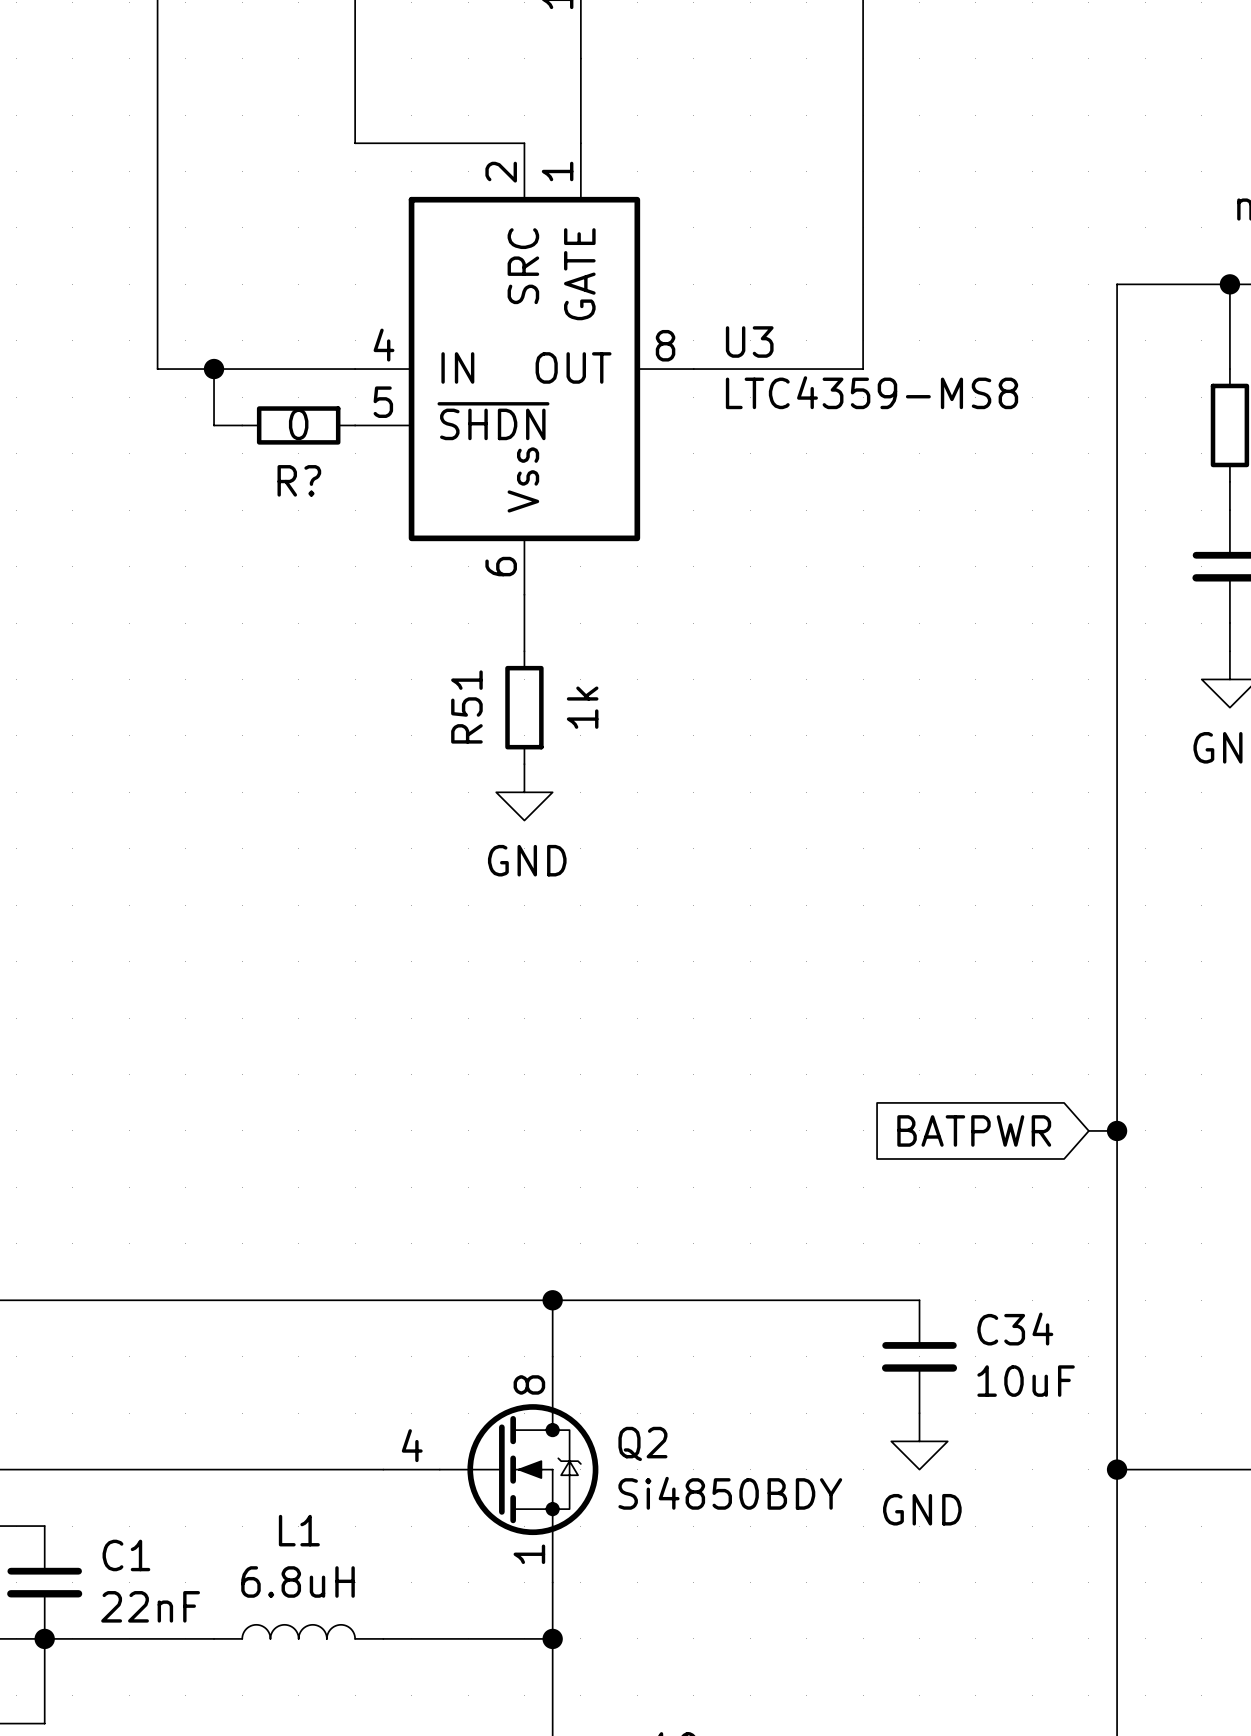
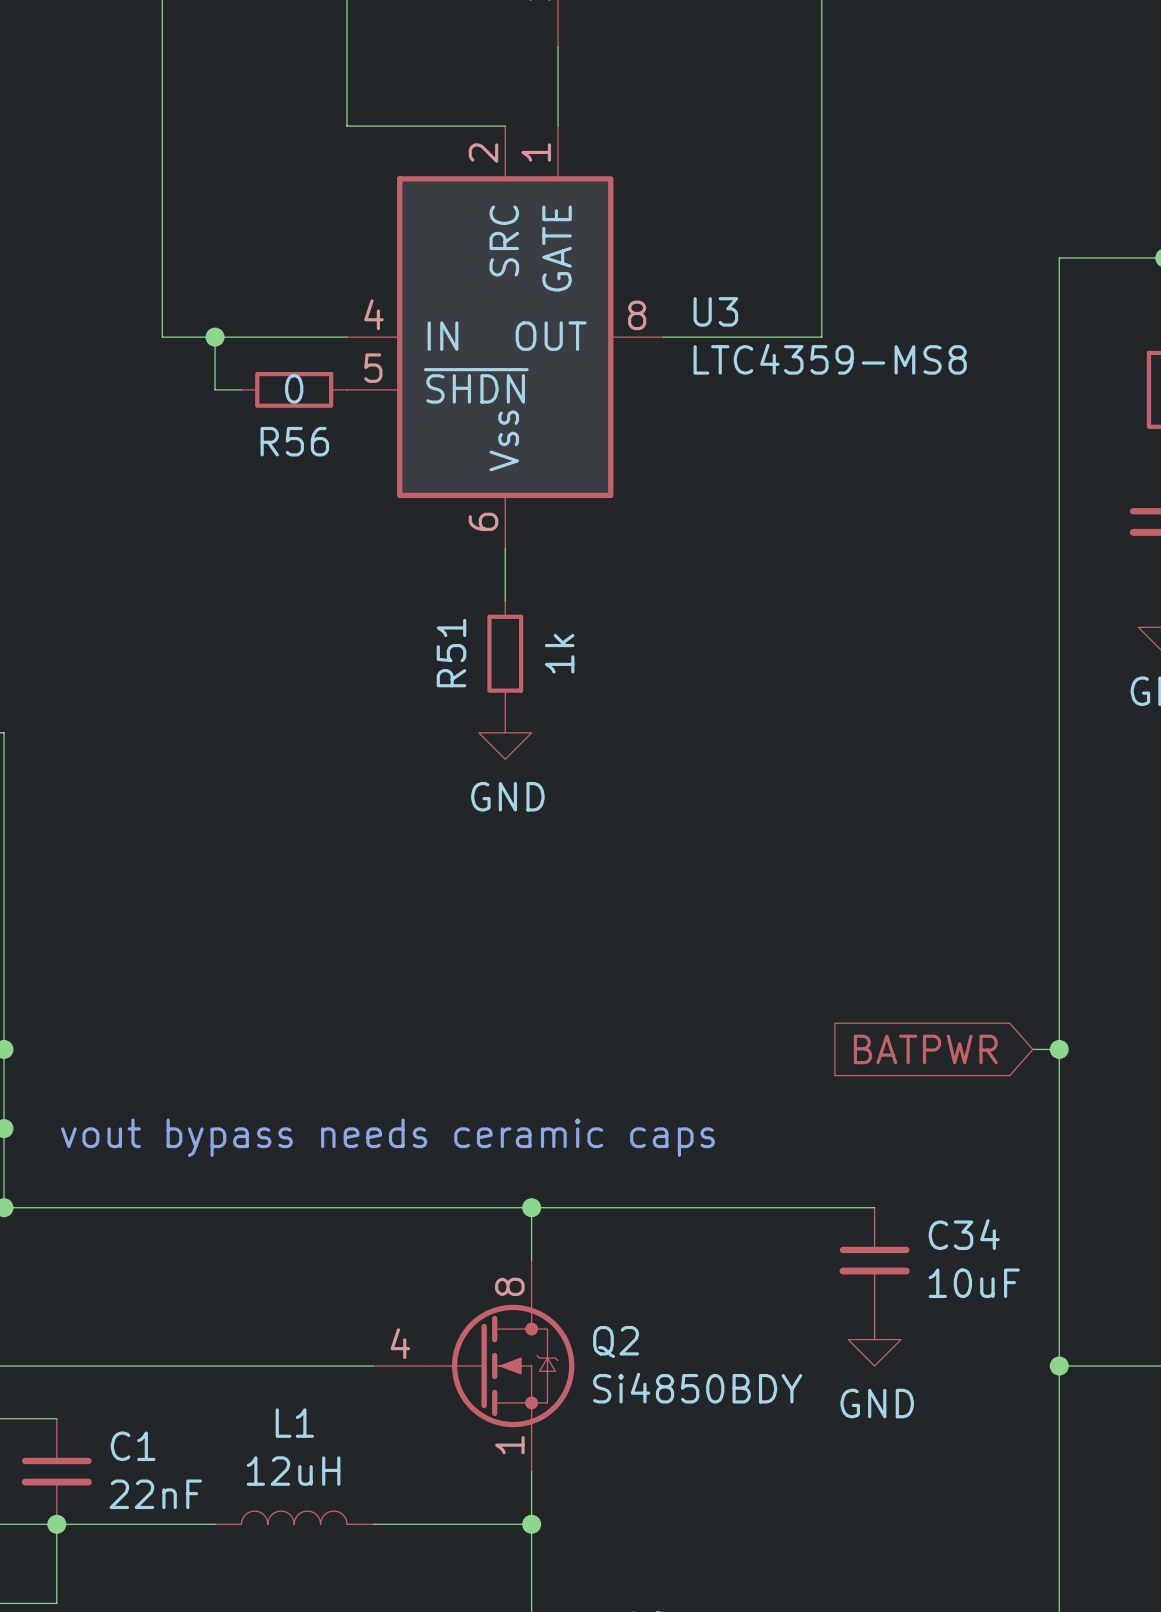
R? name: R? (299, 480) -> R56 (294, 441)
text: none -> vout bypass needs ceramic caps (387, 1137)
L1 value: 6.8uH (298, 1581) -> 12uH (293, 1471)

